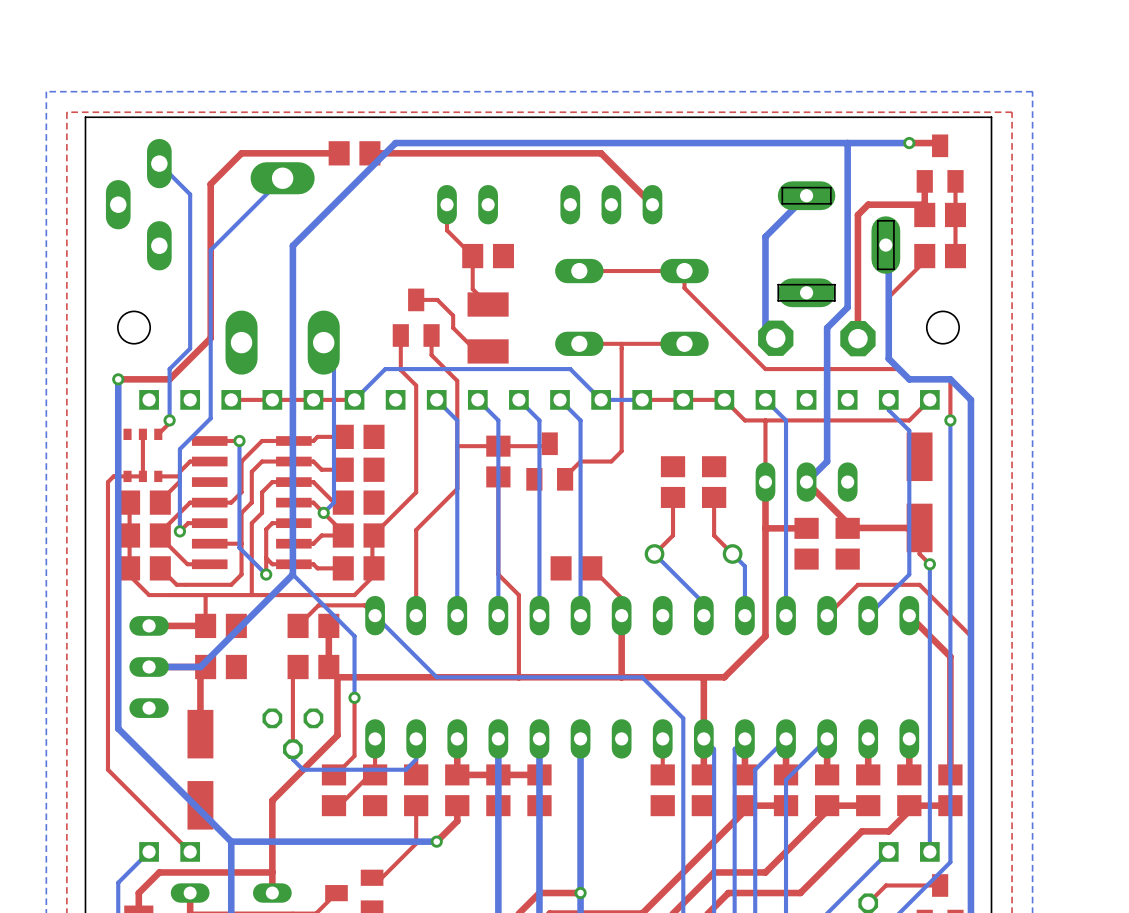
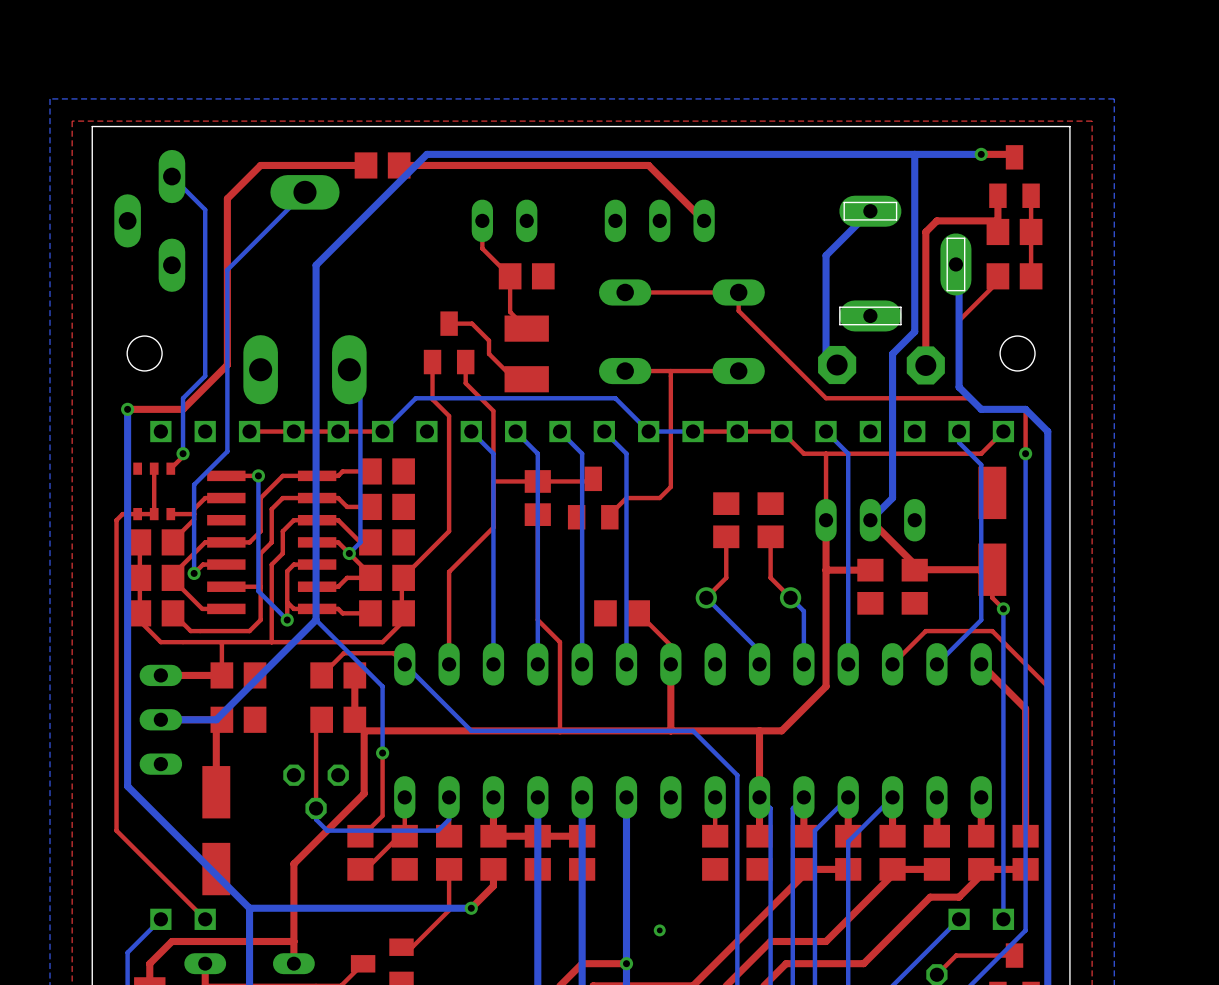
via: none -> (659, 930)

